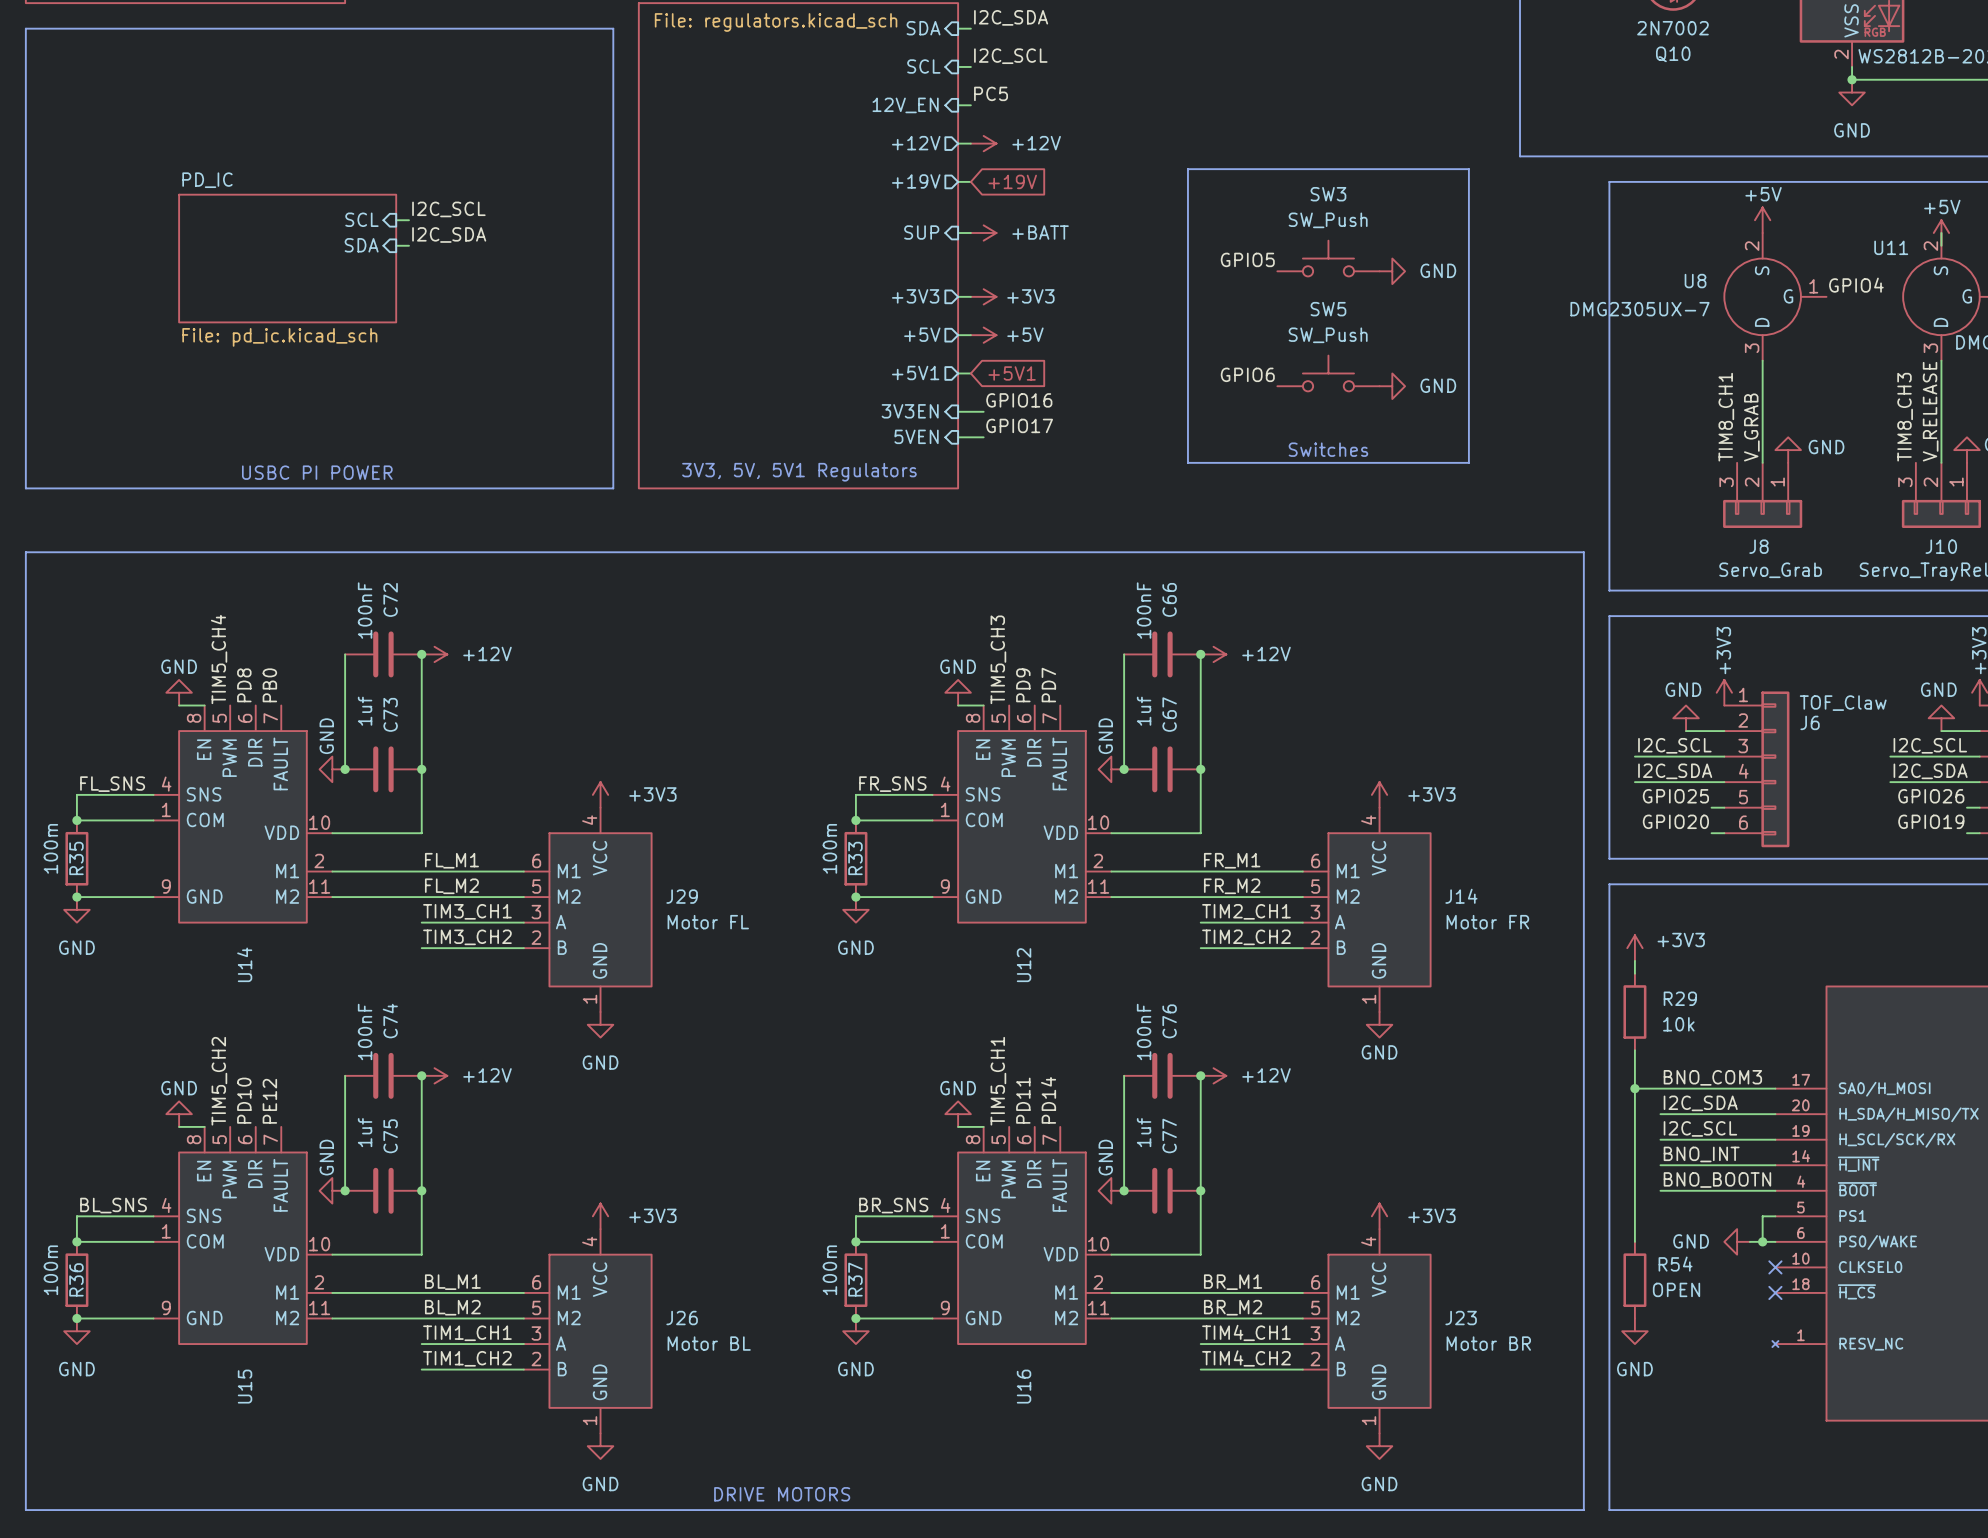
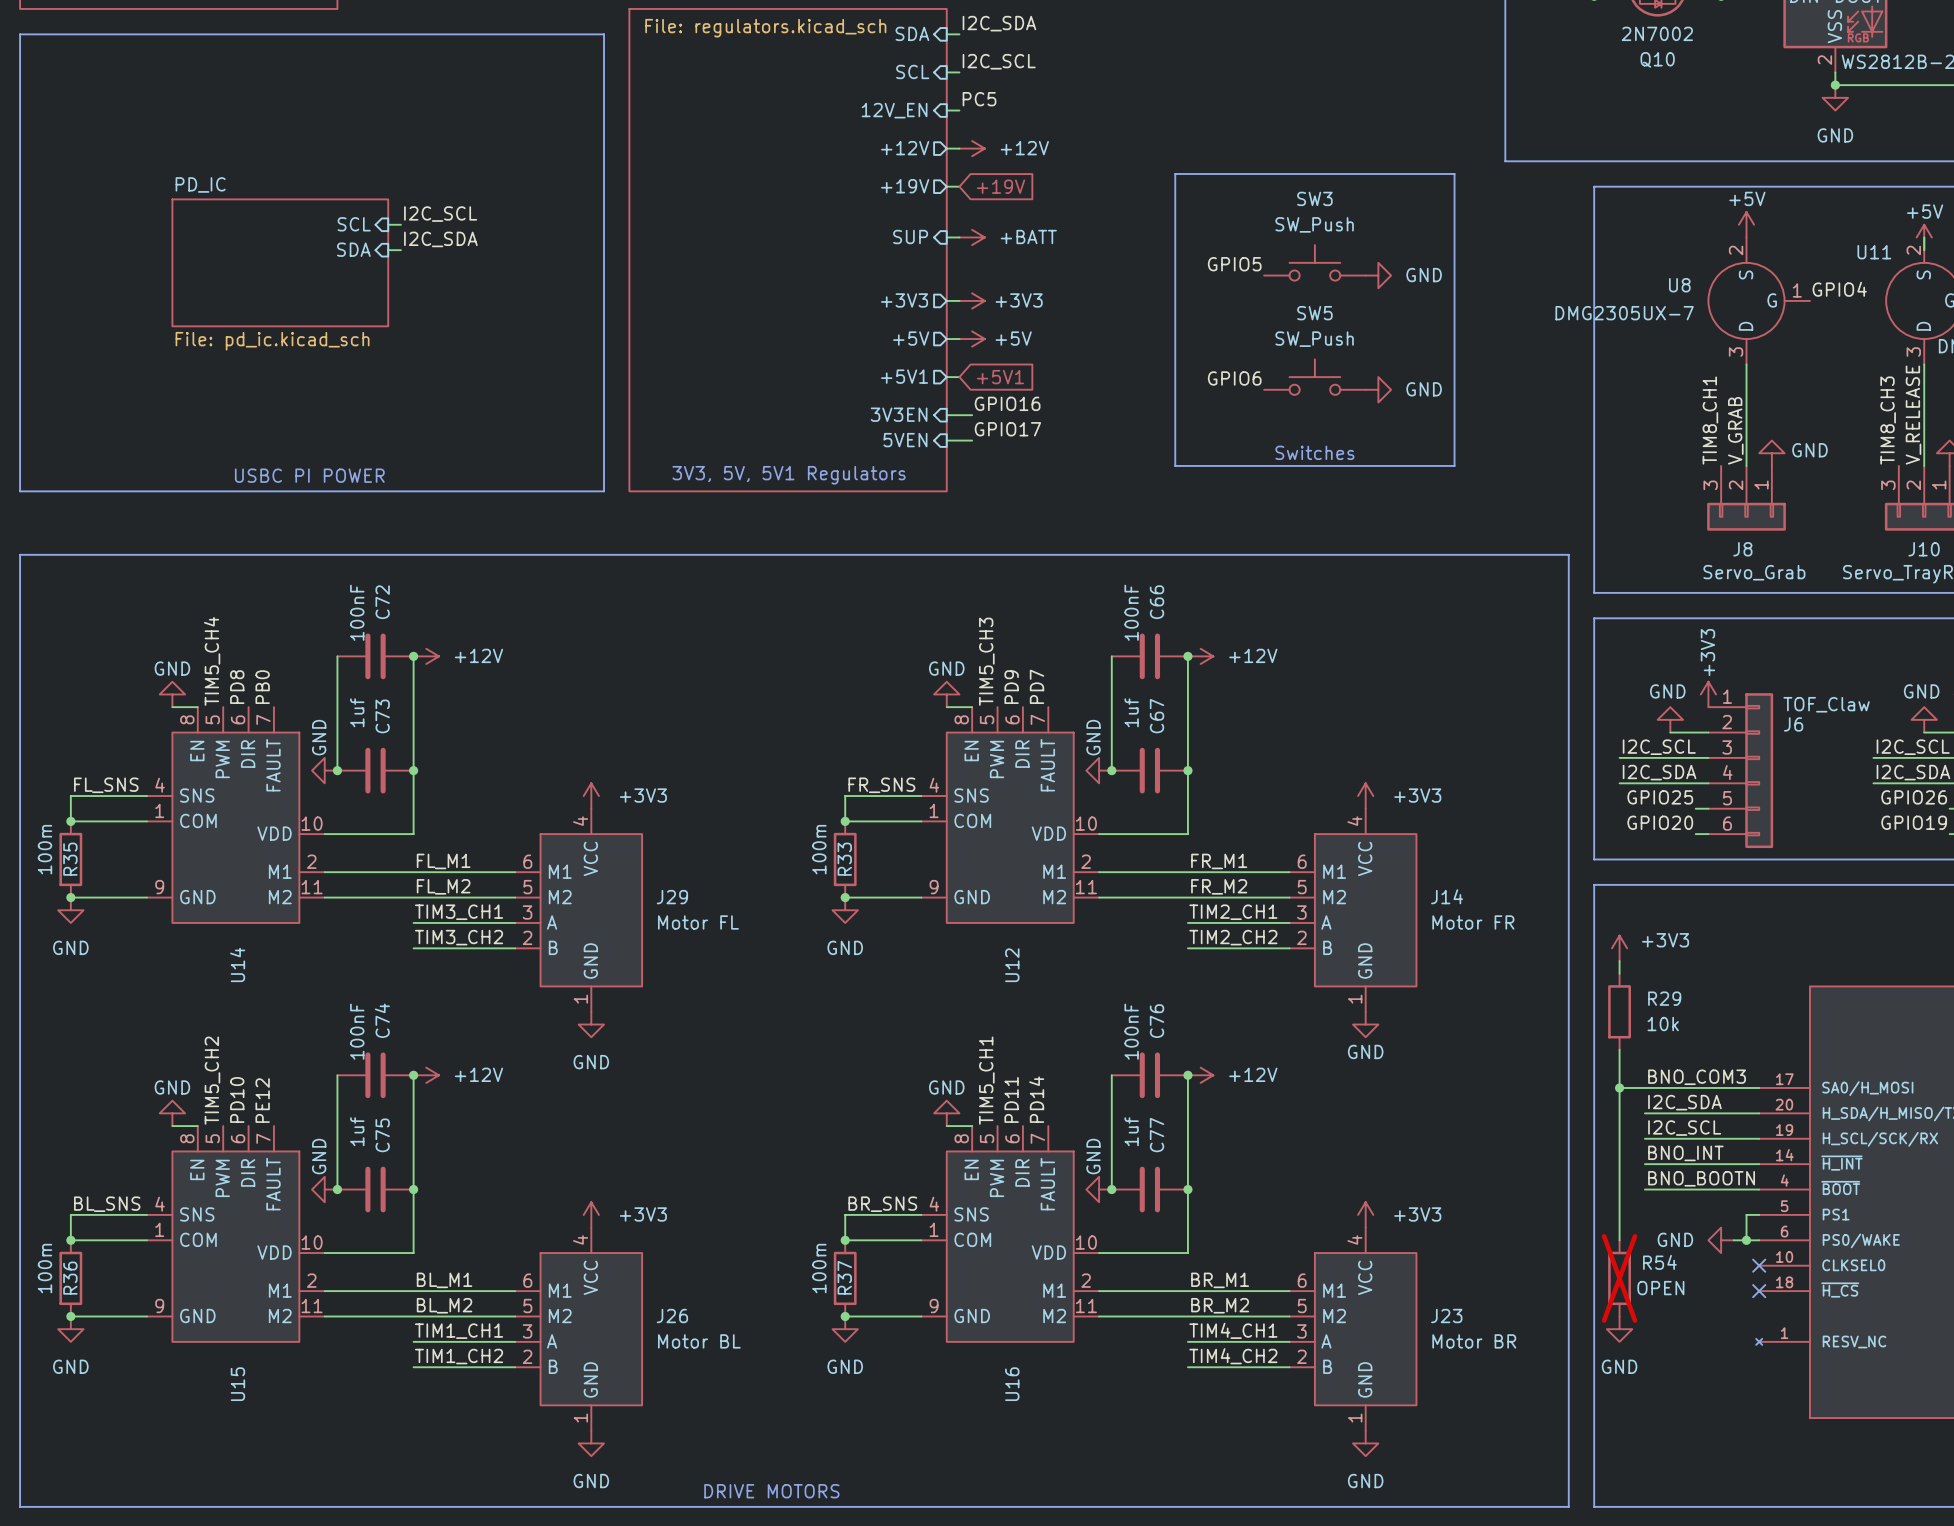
R54 do-not-place cross: none -> (1619, 1278)

